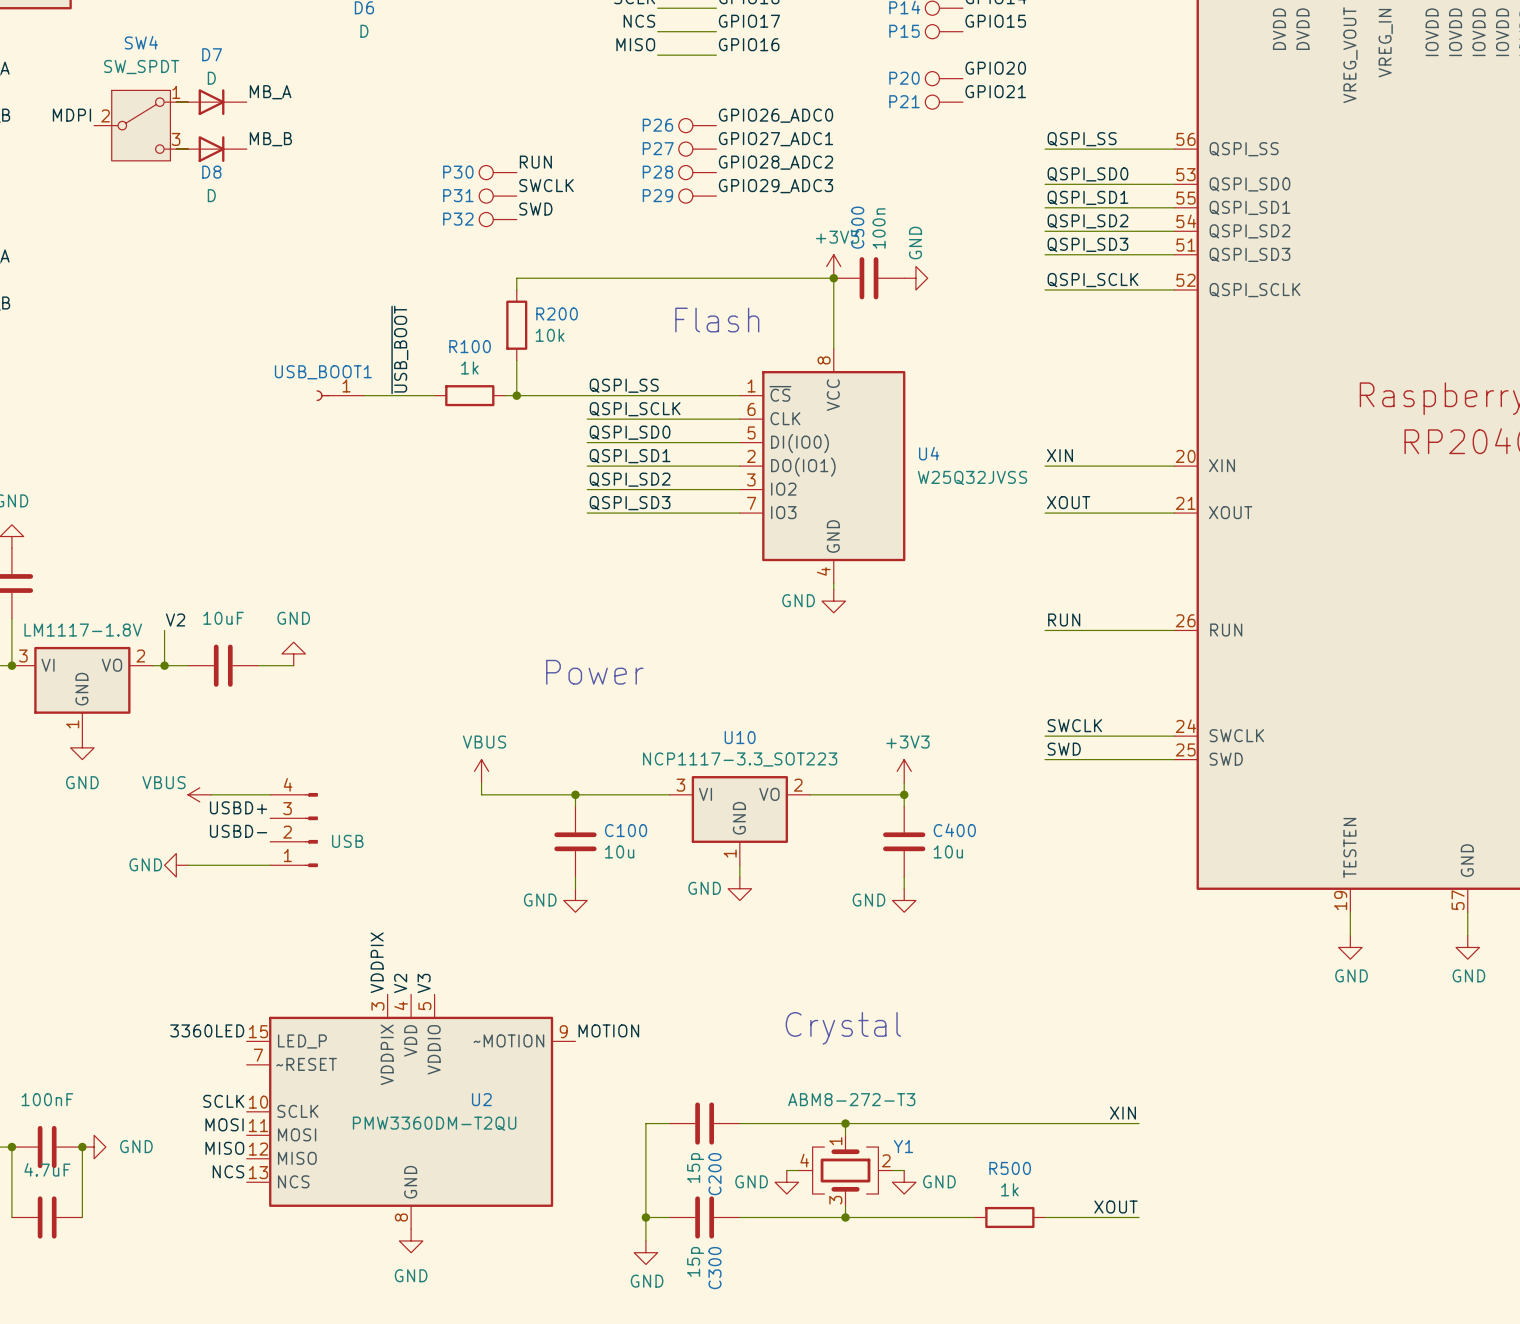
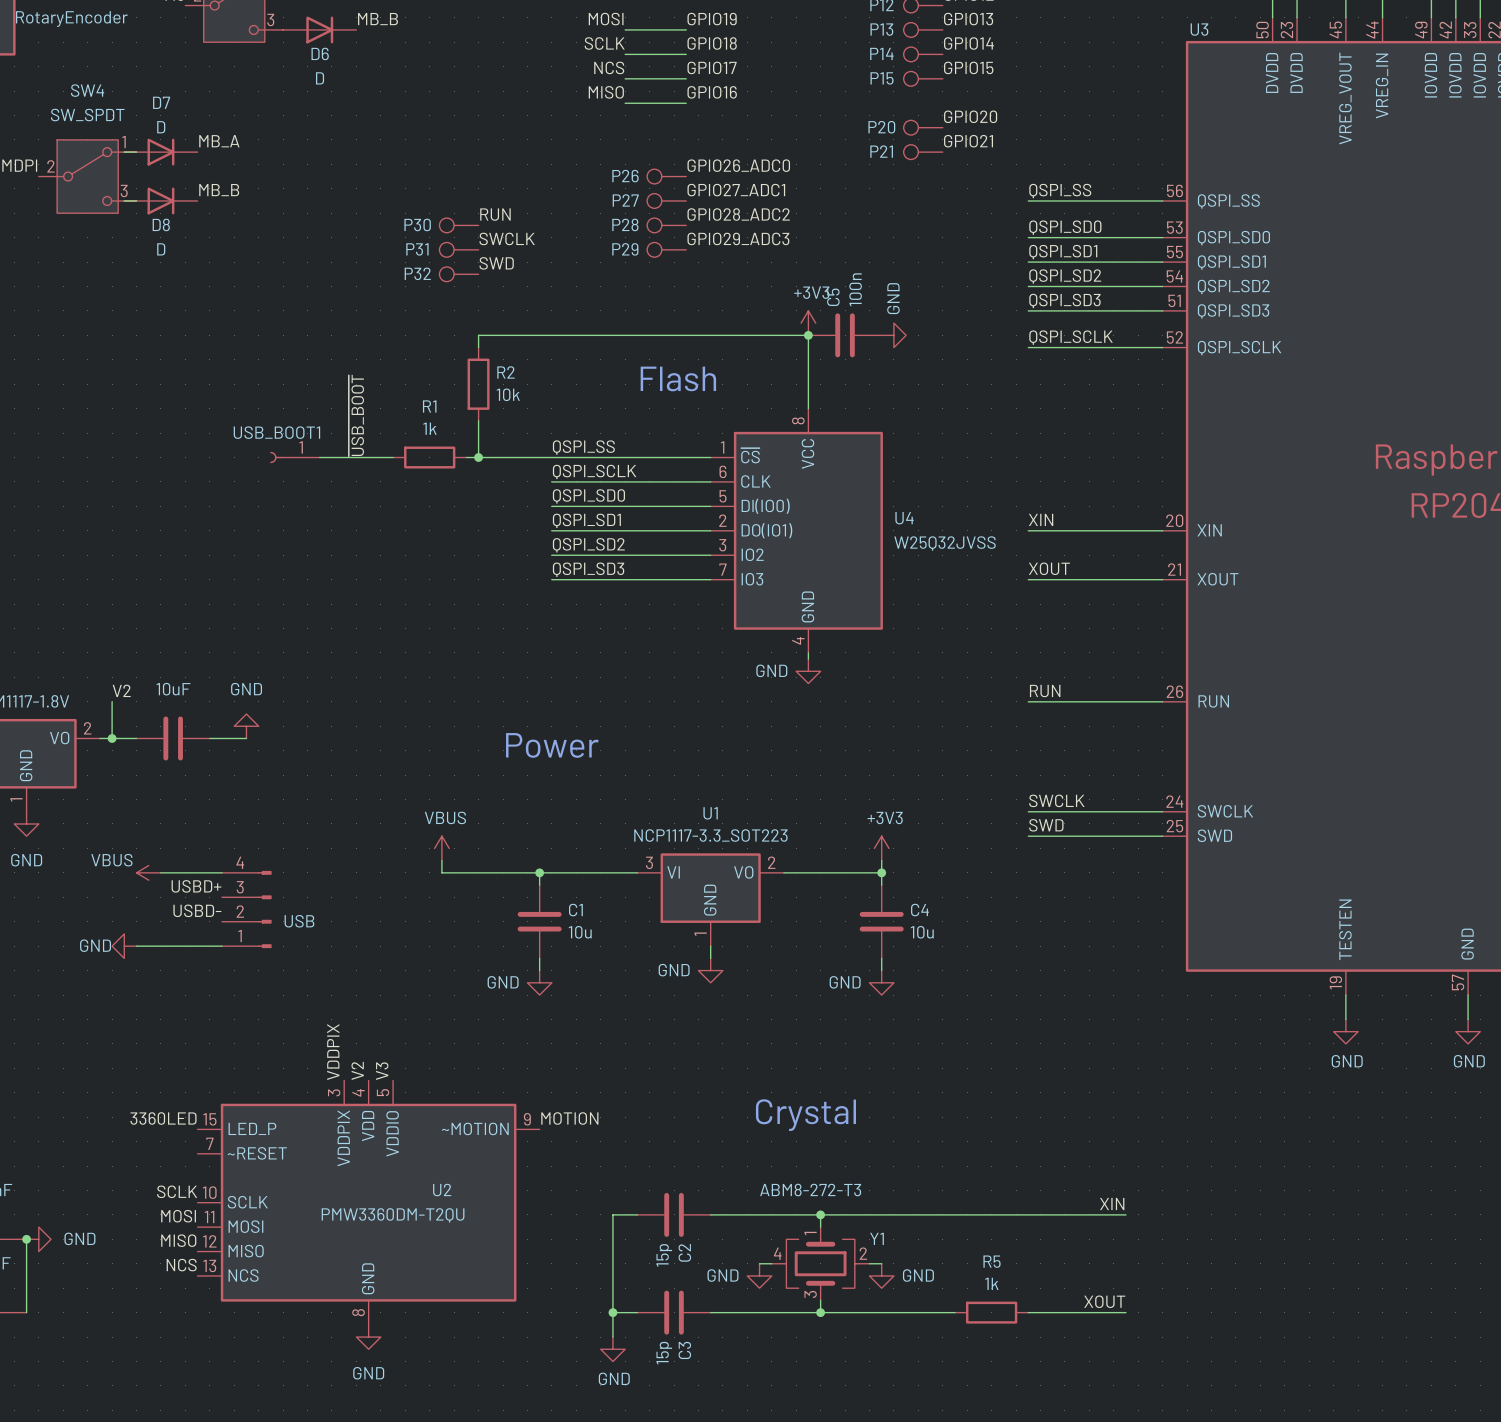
C500 name: C500 (857, 227) -> C5 (833, 297)
R200 name: R200 (557, 313) -> R2 (506, 372)
R100 name: R100 (470, 346) -> R1 (429, 406)
U10 name: U10 (740, 737) -> U1 (710, 813)
C100 name: C100 (626, 830) -> C1 (575, 910)
C400 name: C400 (954, 830) -> C4 (919, 910)
R500 name: R500 (1010, 1168) -> R5 (992, 1261)
C200 name: C200 (714, 1174) -> C2 (684, 1252)
C300 name: C300 (714, 1268) -> C3 (684, 1350)

